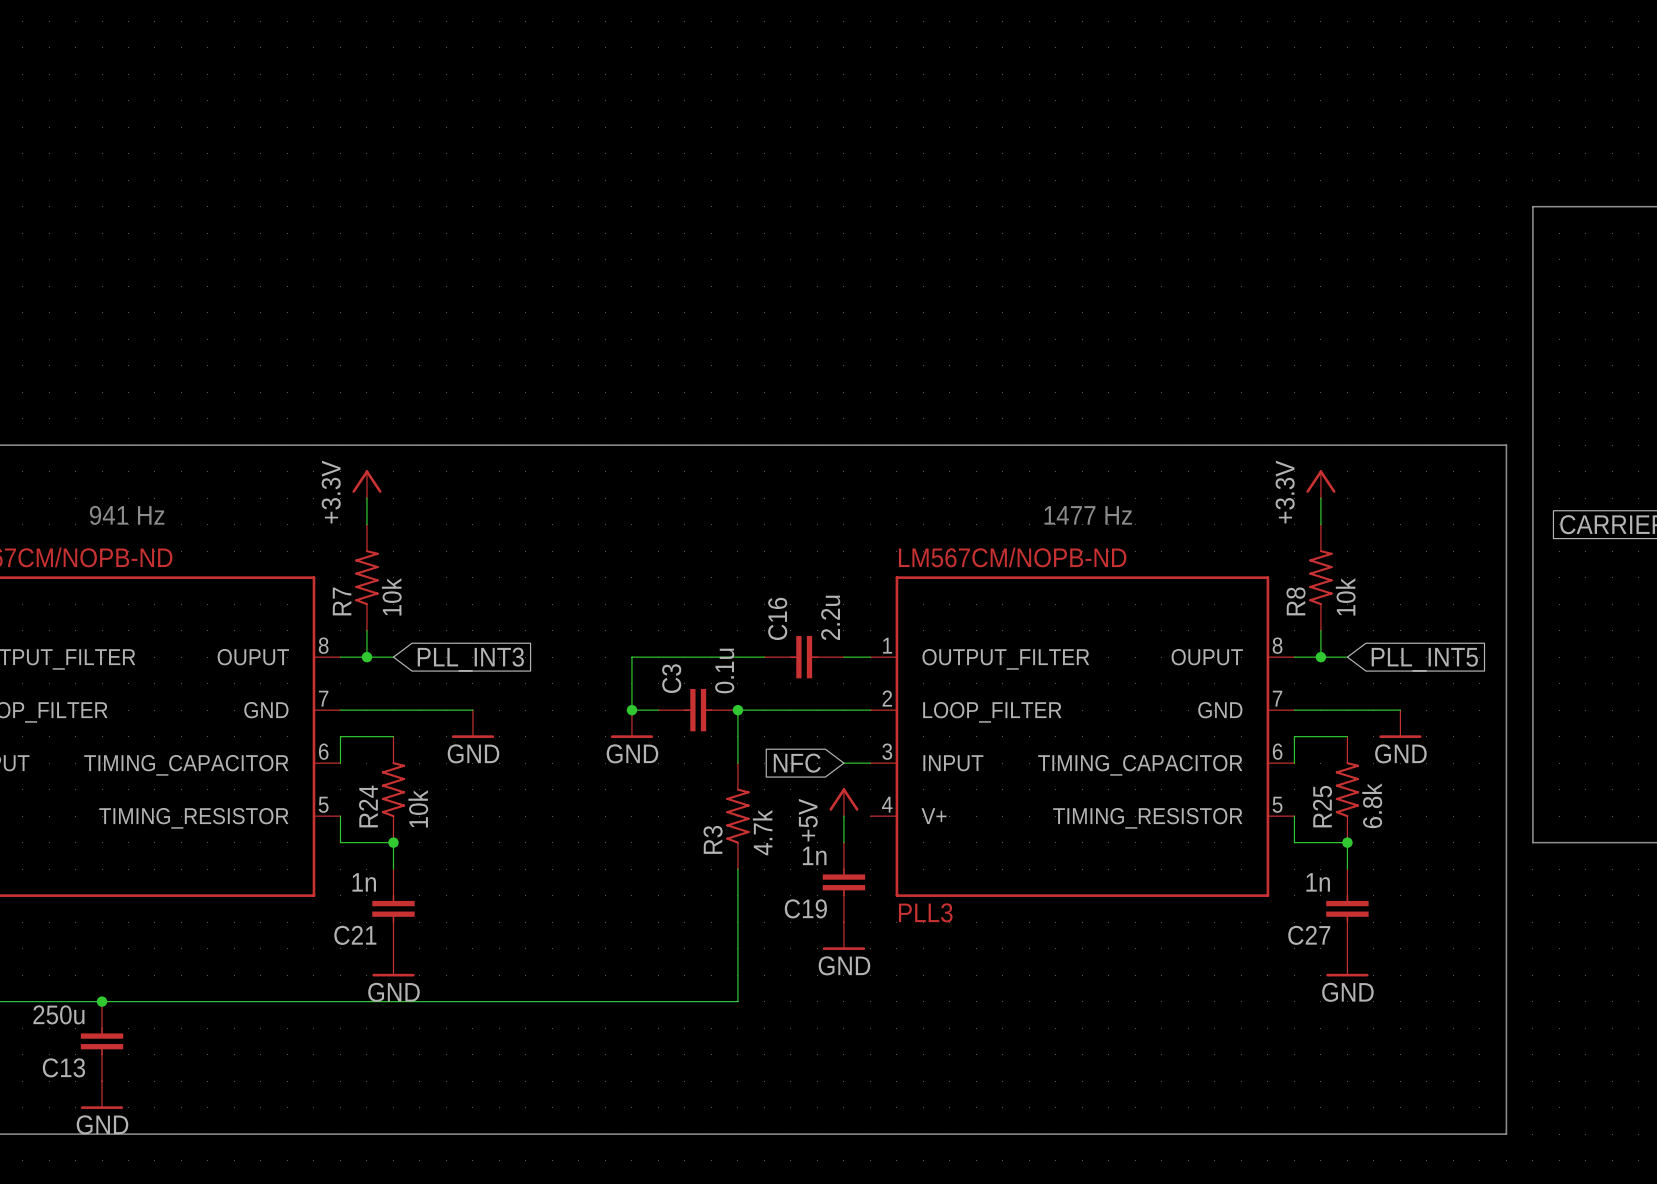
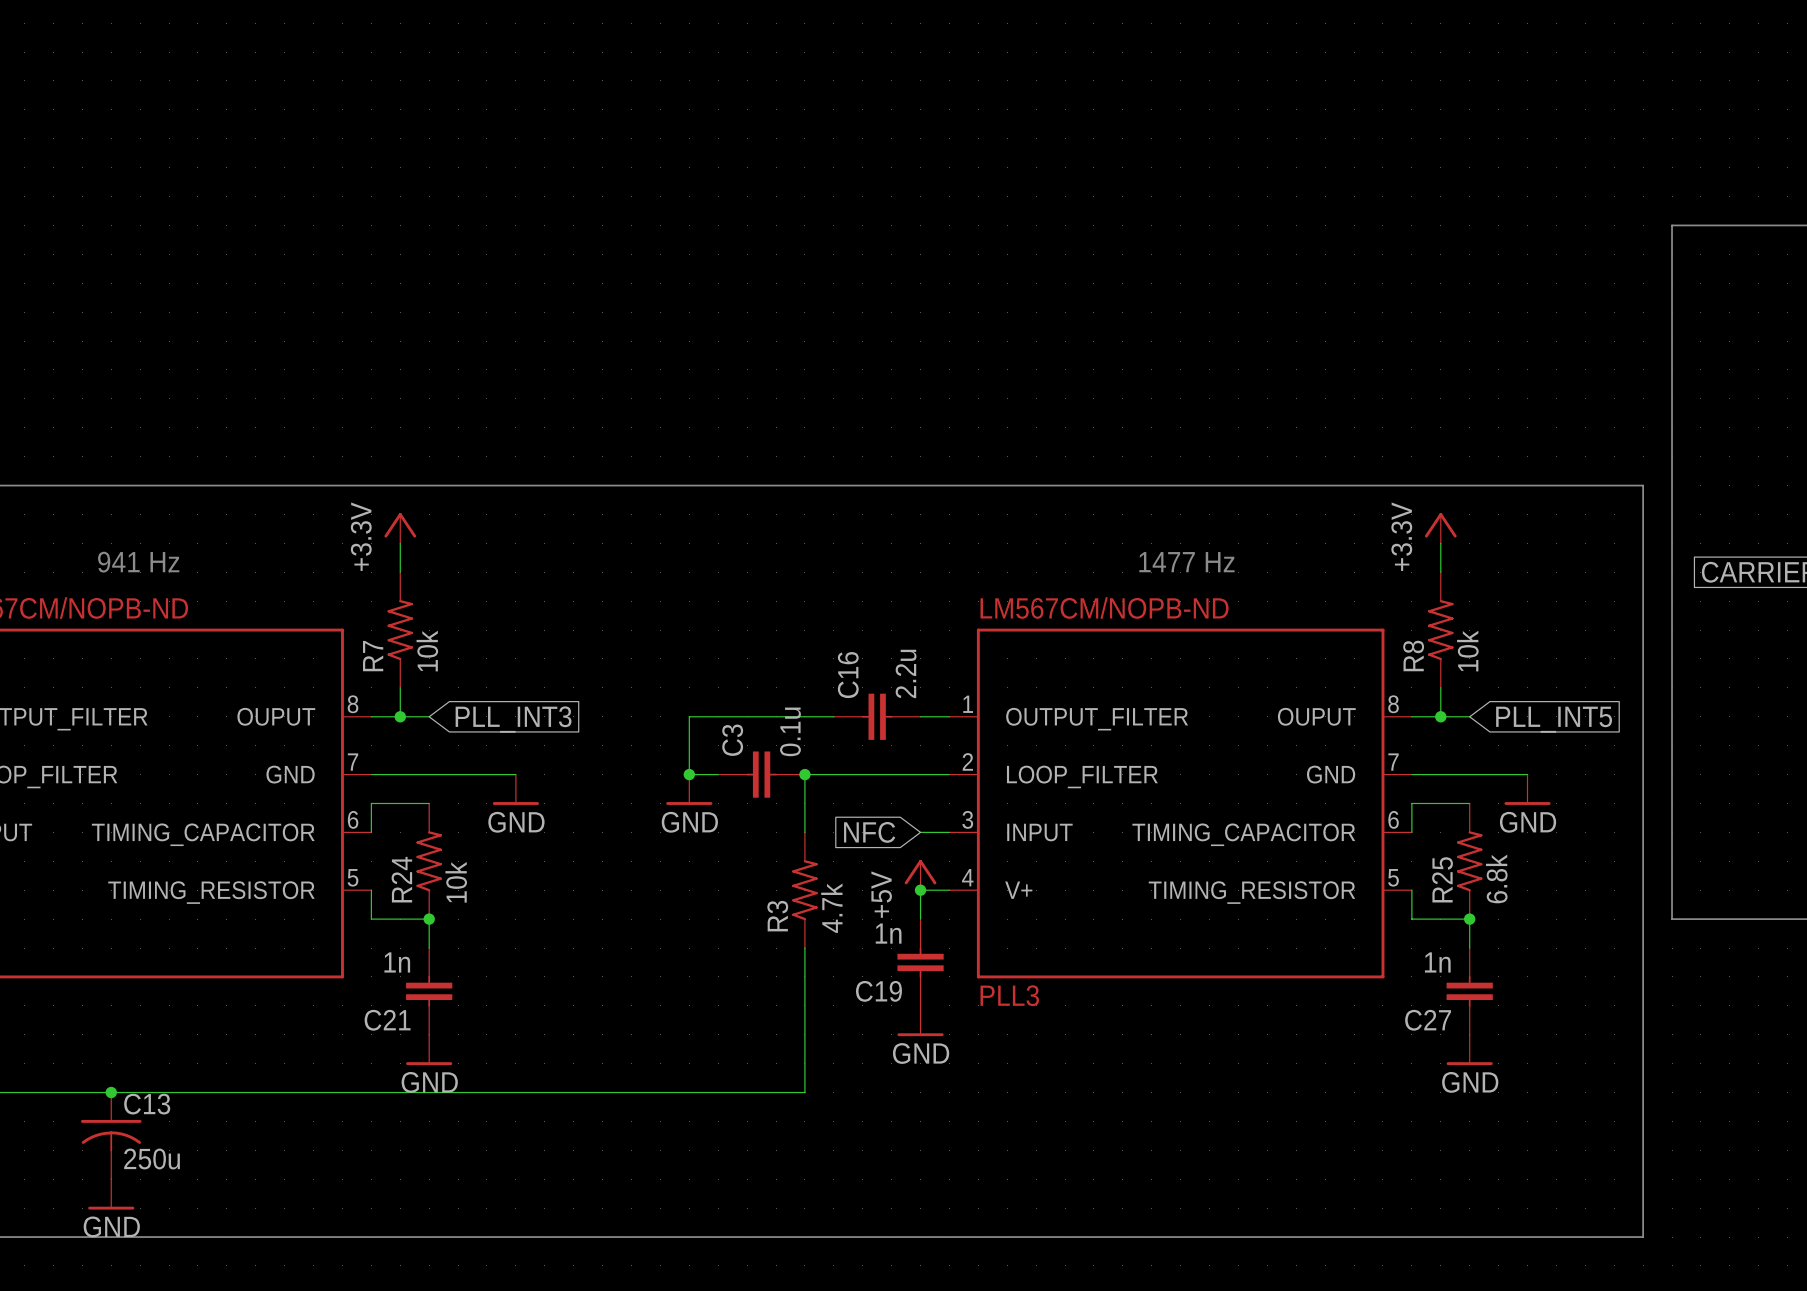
wire: none -> (920, 890) (949, 890)
junction: none -> (920, 890)
C13 symbol: [80, 1001, 124, 1082] -> [80, 1092, 142, 1180]
C13 value position: 250u (58, 1014) -> 250u (152, 1158)
C13 name position: C13 (63, 1067) -> C13 (147, 1104)

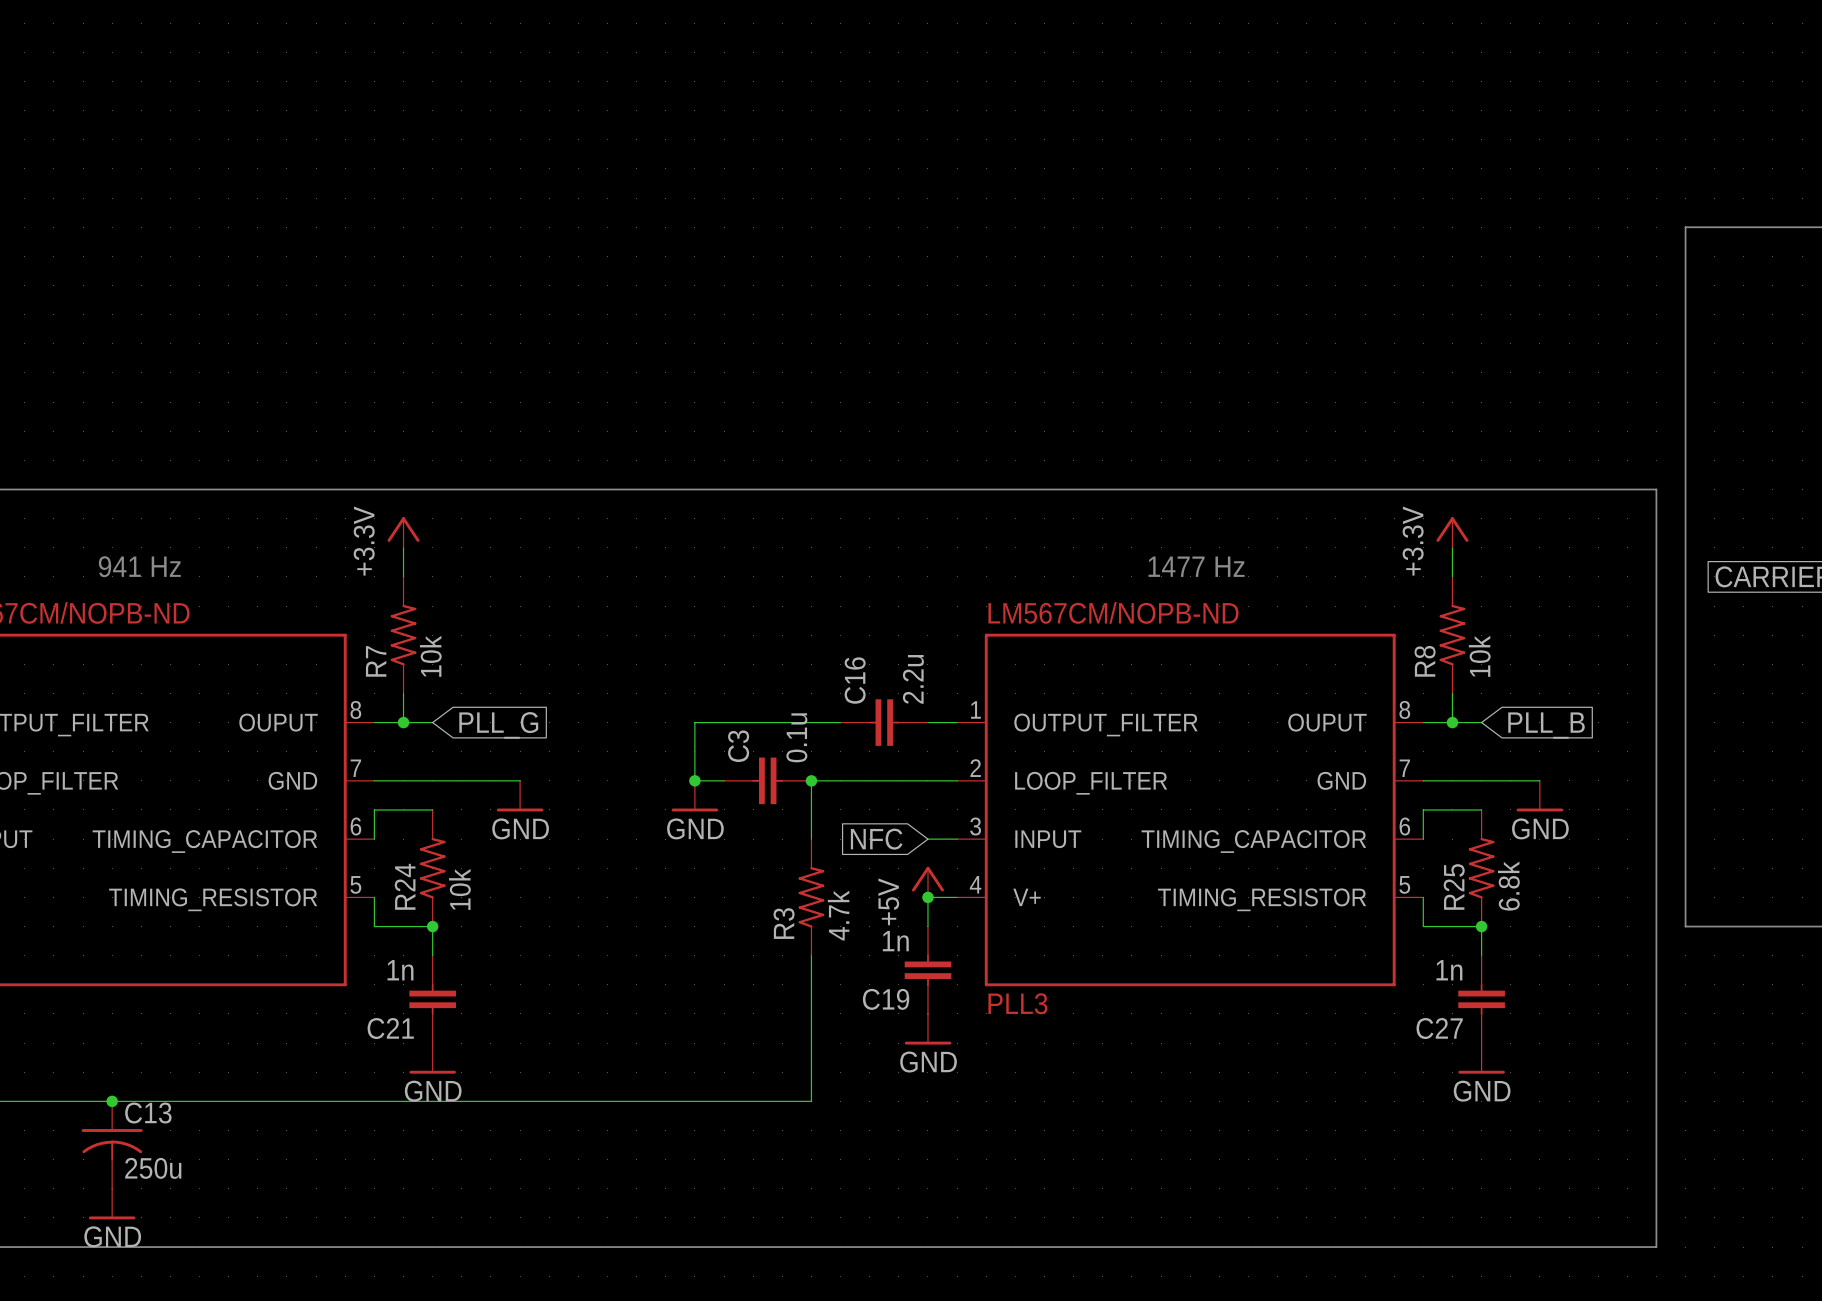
global label: PLL_INT3 (513, 719) -> PLL_G (498, 725)
global label: PLL_INT5 (1554, 719) -> PLL_B (1546, 725)

